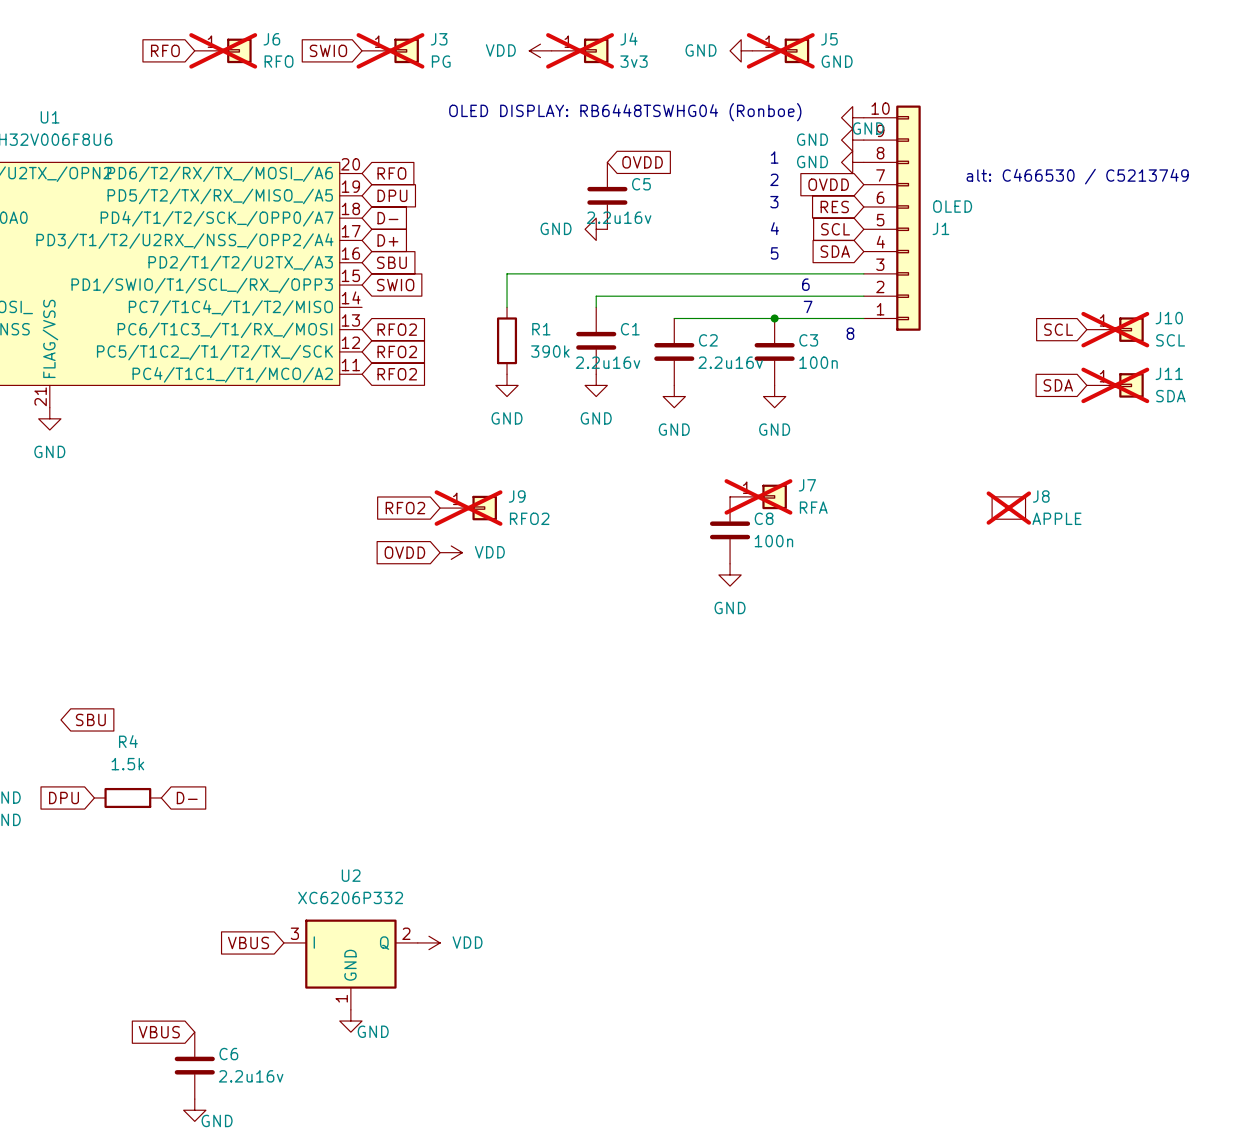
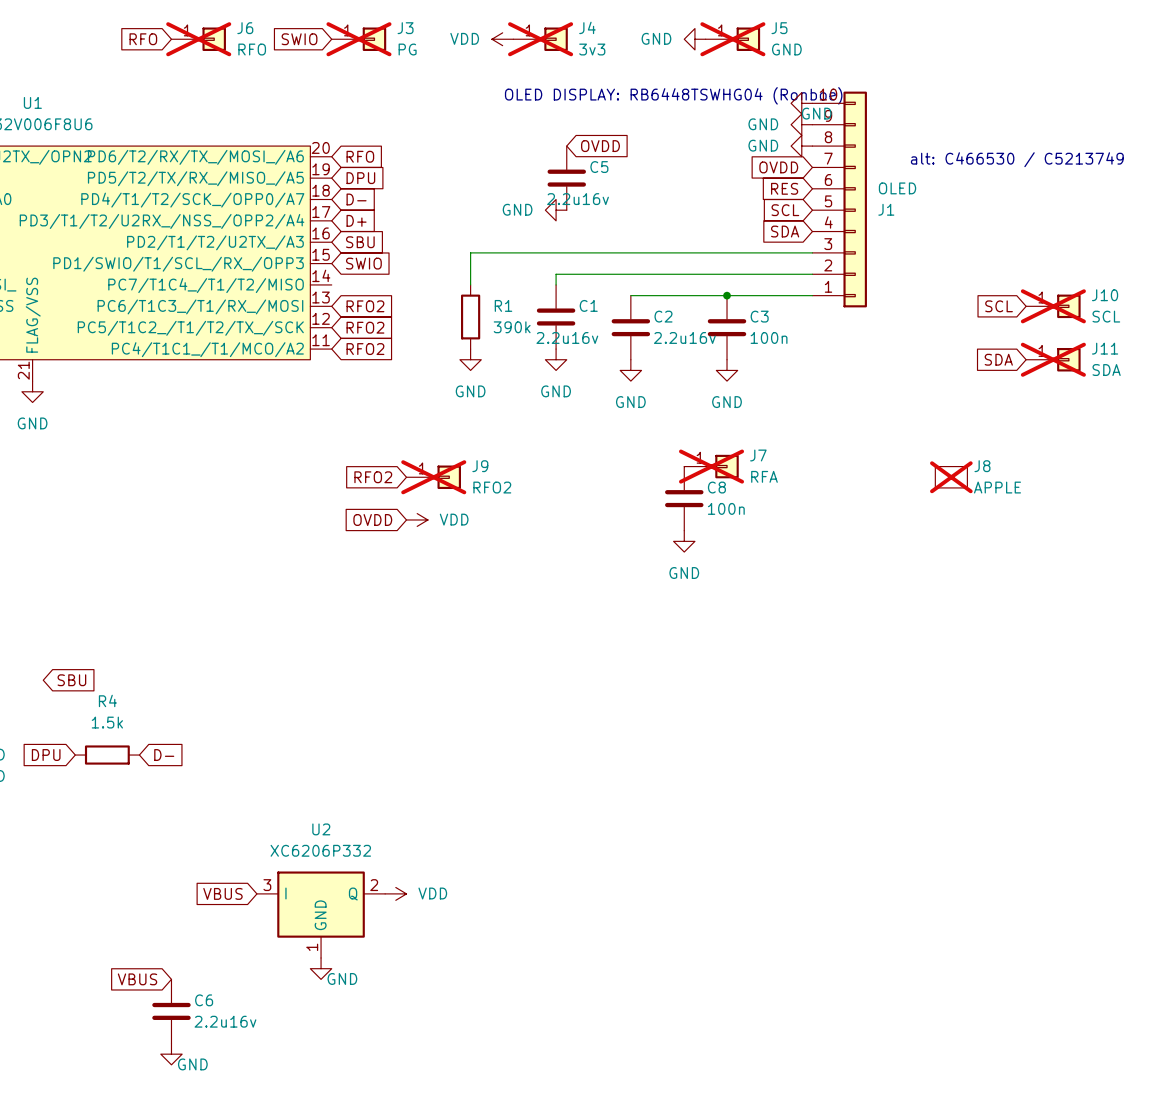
text position: OLED DISPLAY: RB6448TSWHG04 (Ronboe) (625, 112) -> OLED DISPLAY: RB6448TSWHG04 (Ronboe) (673, 95)
text: 1 (774, 157) -> none
text: 2 (774, 179) -> none
text: 3 (774, 202) -> none
text: 4 (774, 228) -> none
text: 5 (774, 253) -> none
text: 6 (805, 284) -> none
text: 7 (808, 306) -> none
text: 8 (850, 333) -> none

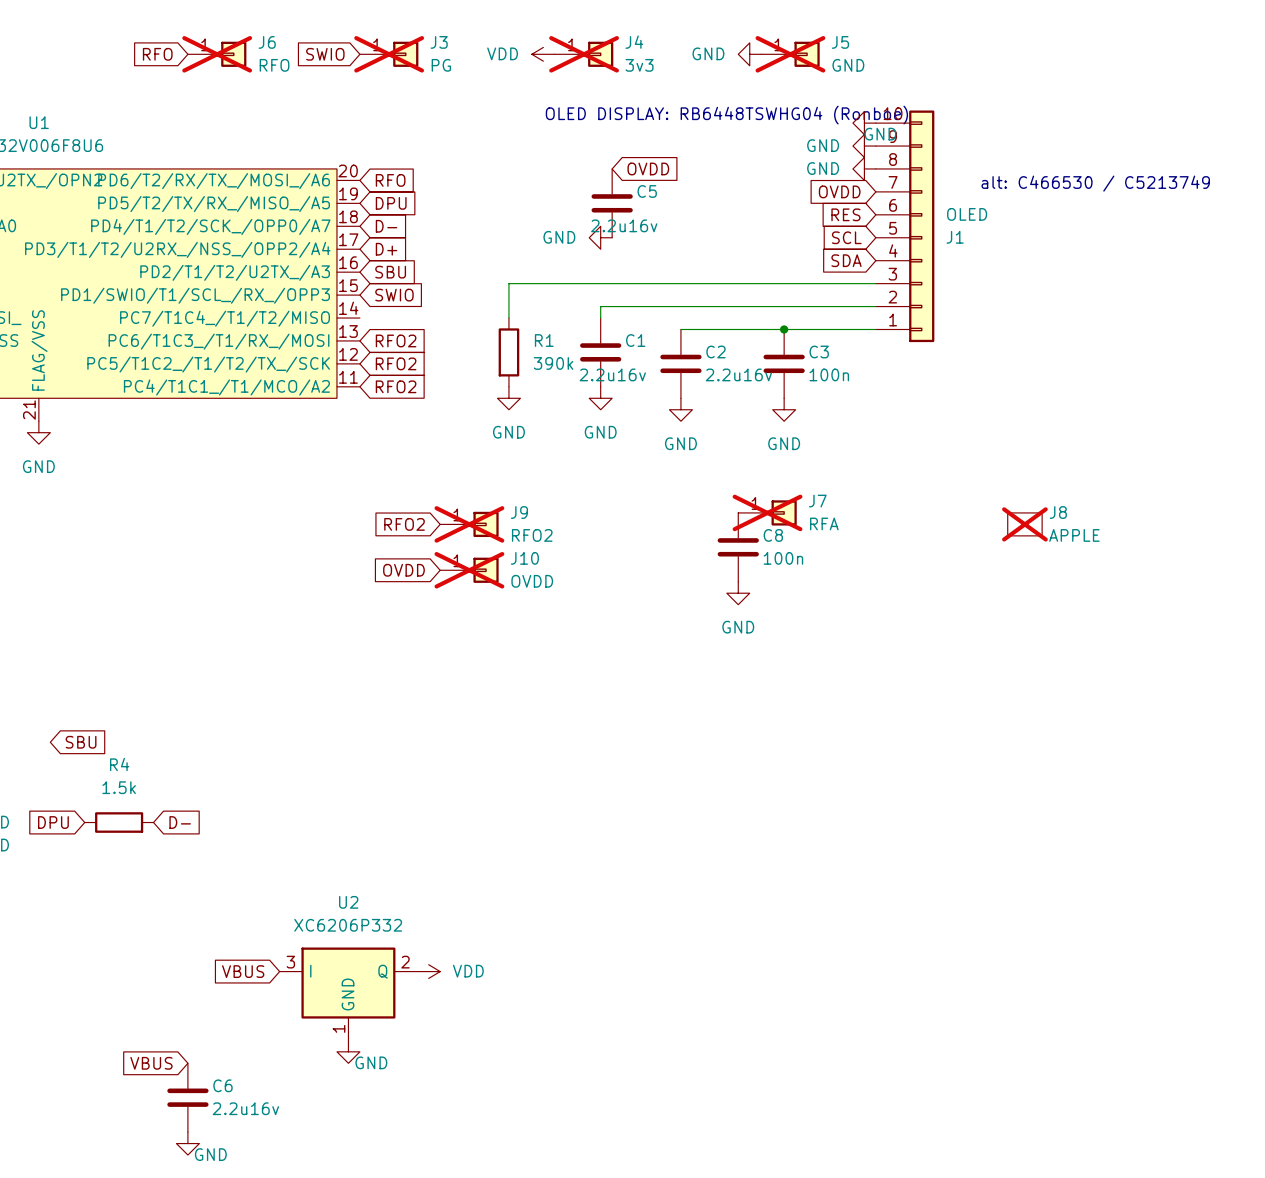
global label: SCL (999, 306) -> none
J10 position: (1053, 306) -> (469, 570)
J10 value: SCL (1106, 316) -> OVDD (532, 581)
global label: SDA (998, 359) -> none
J11: SDA (1053, 359) -> none
power symbol: VDD (417, 519) -> none

